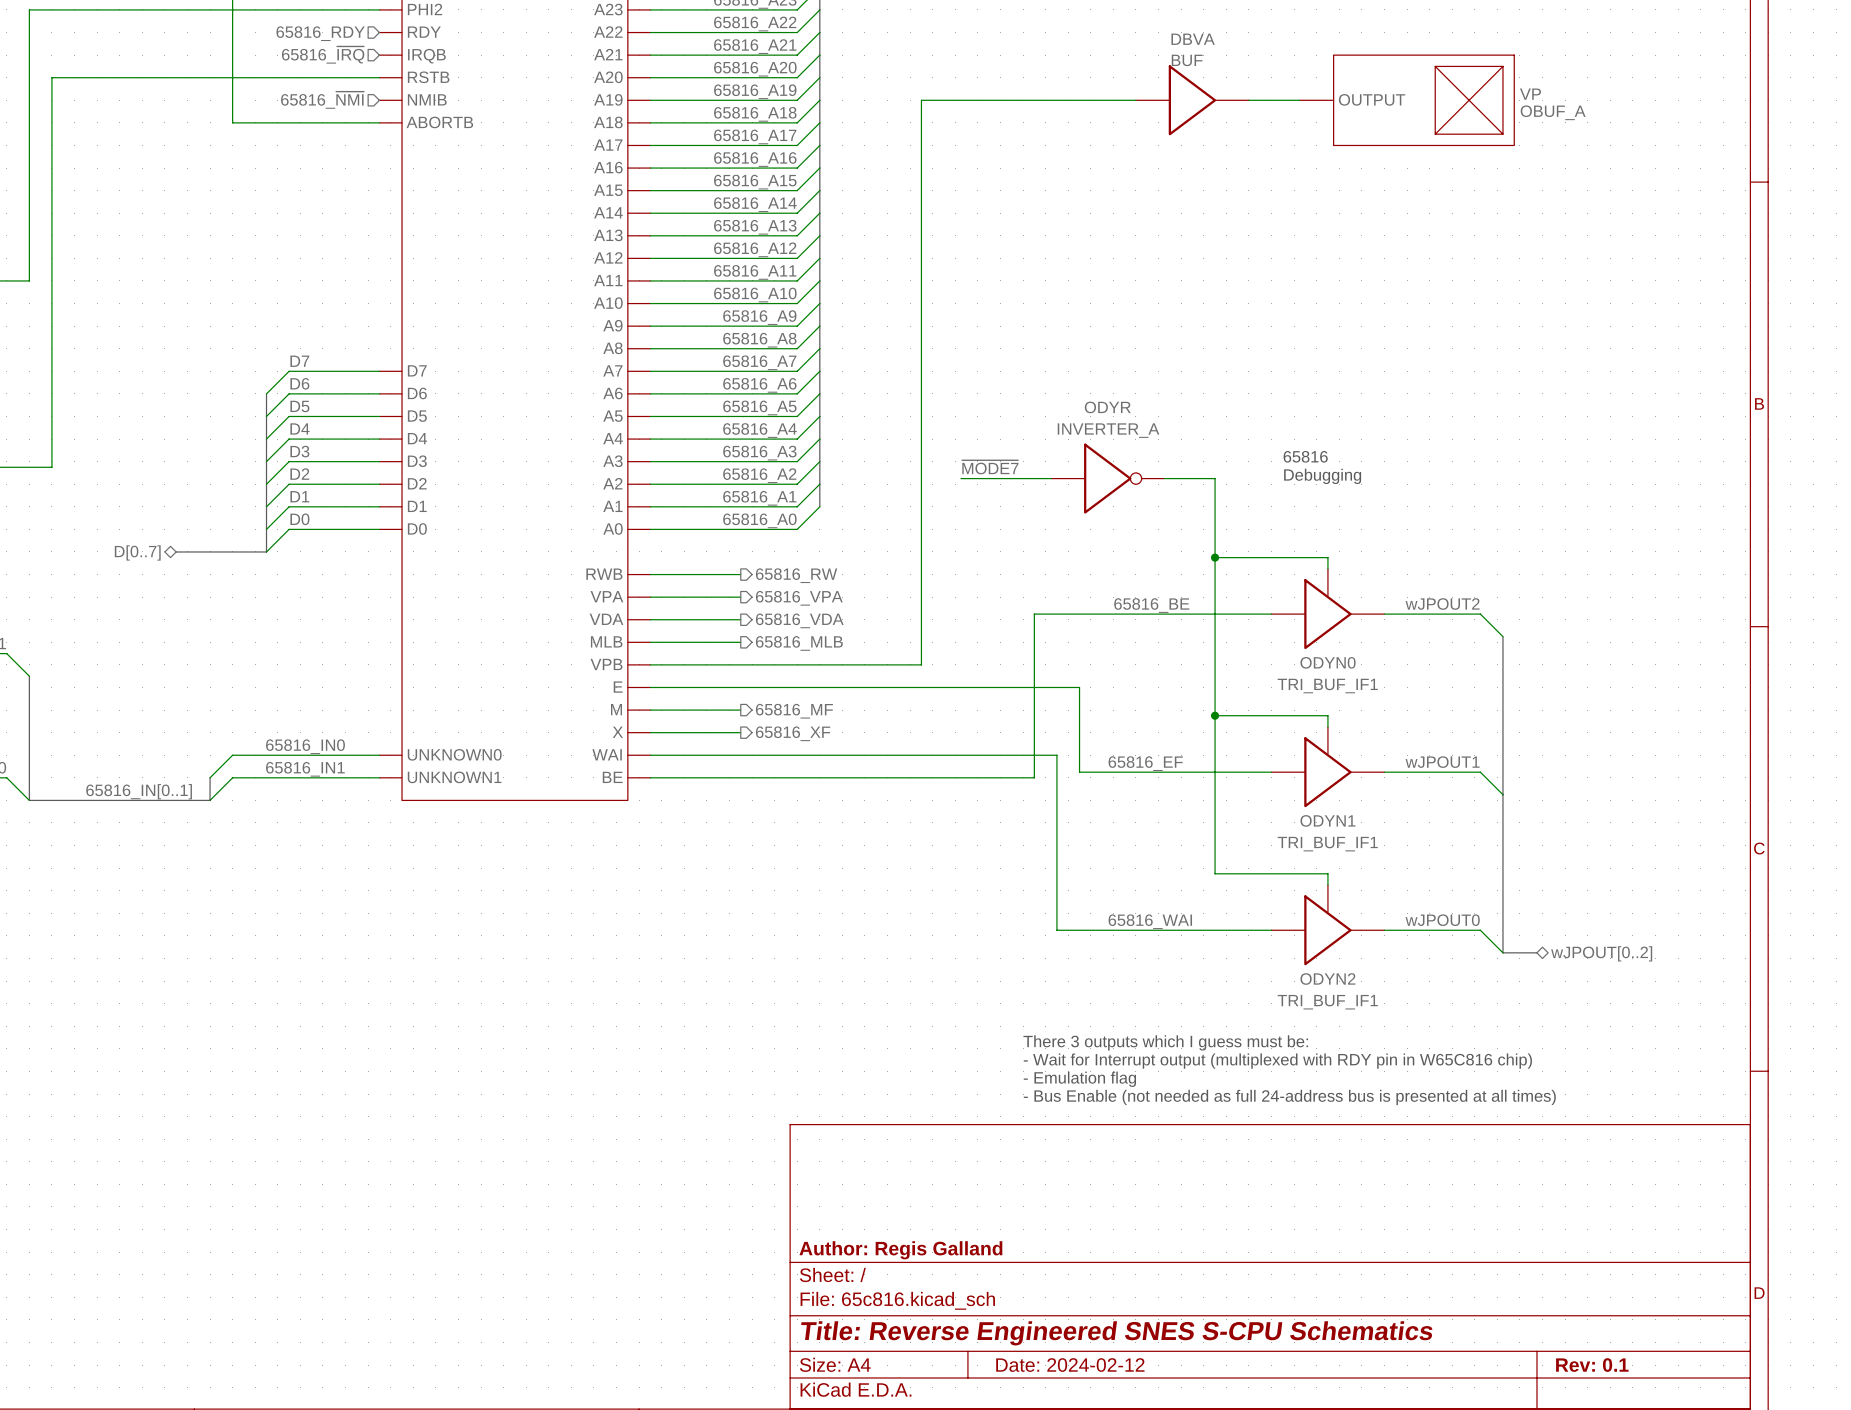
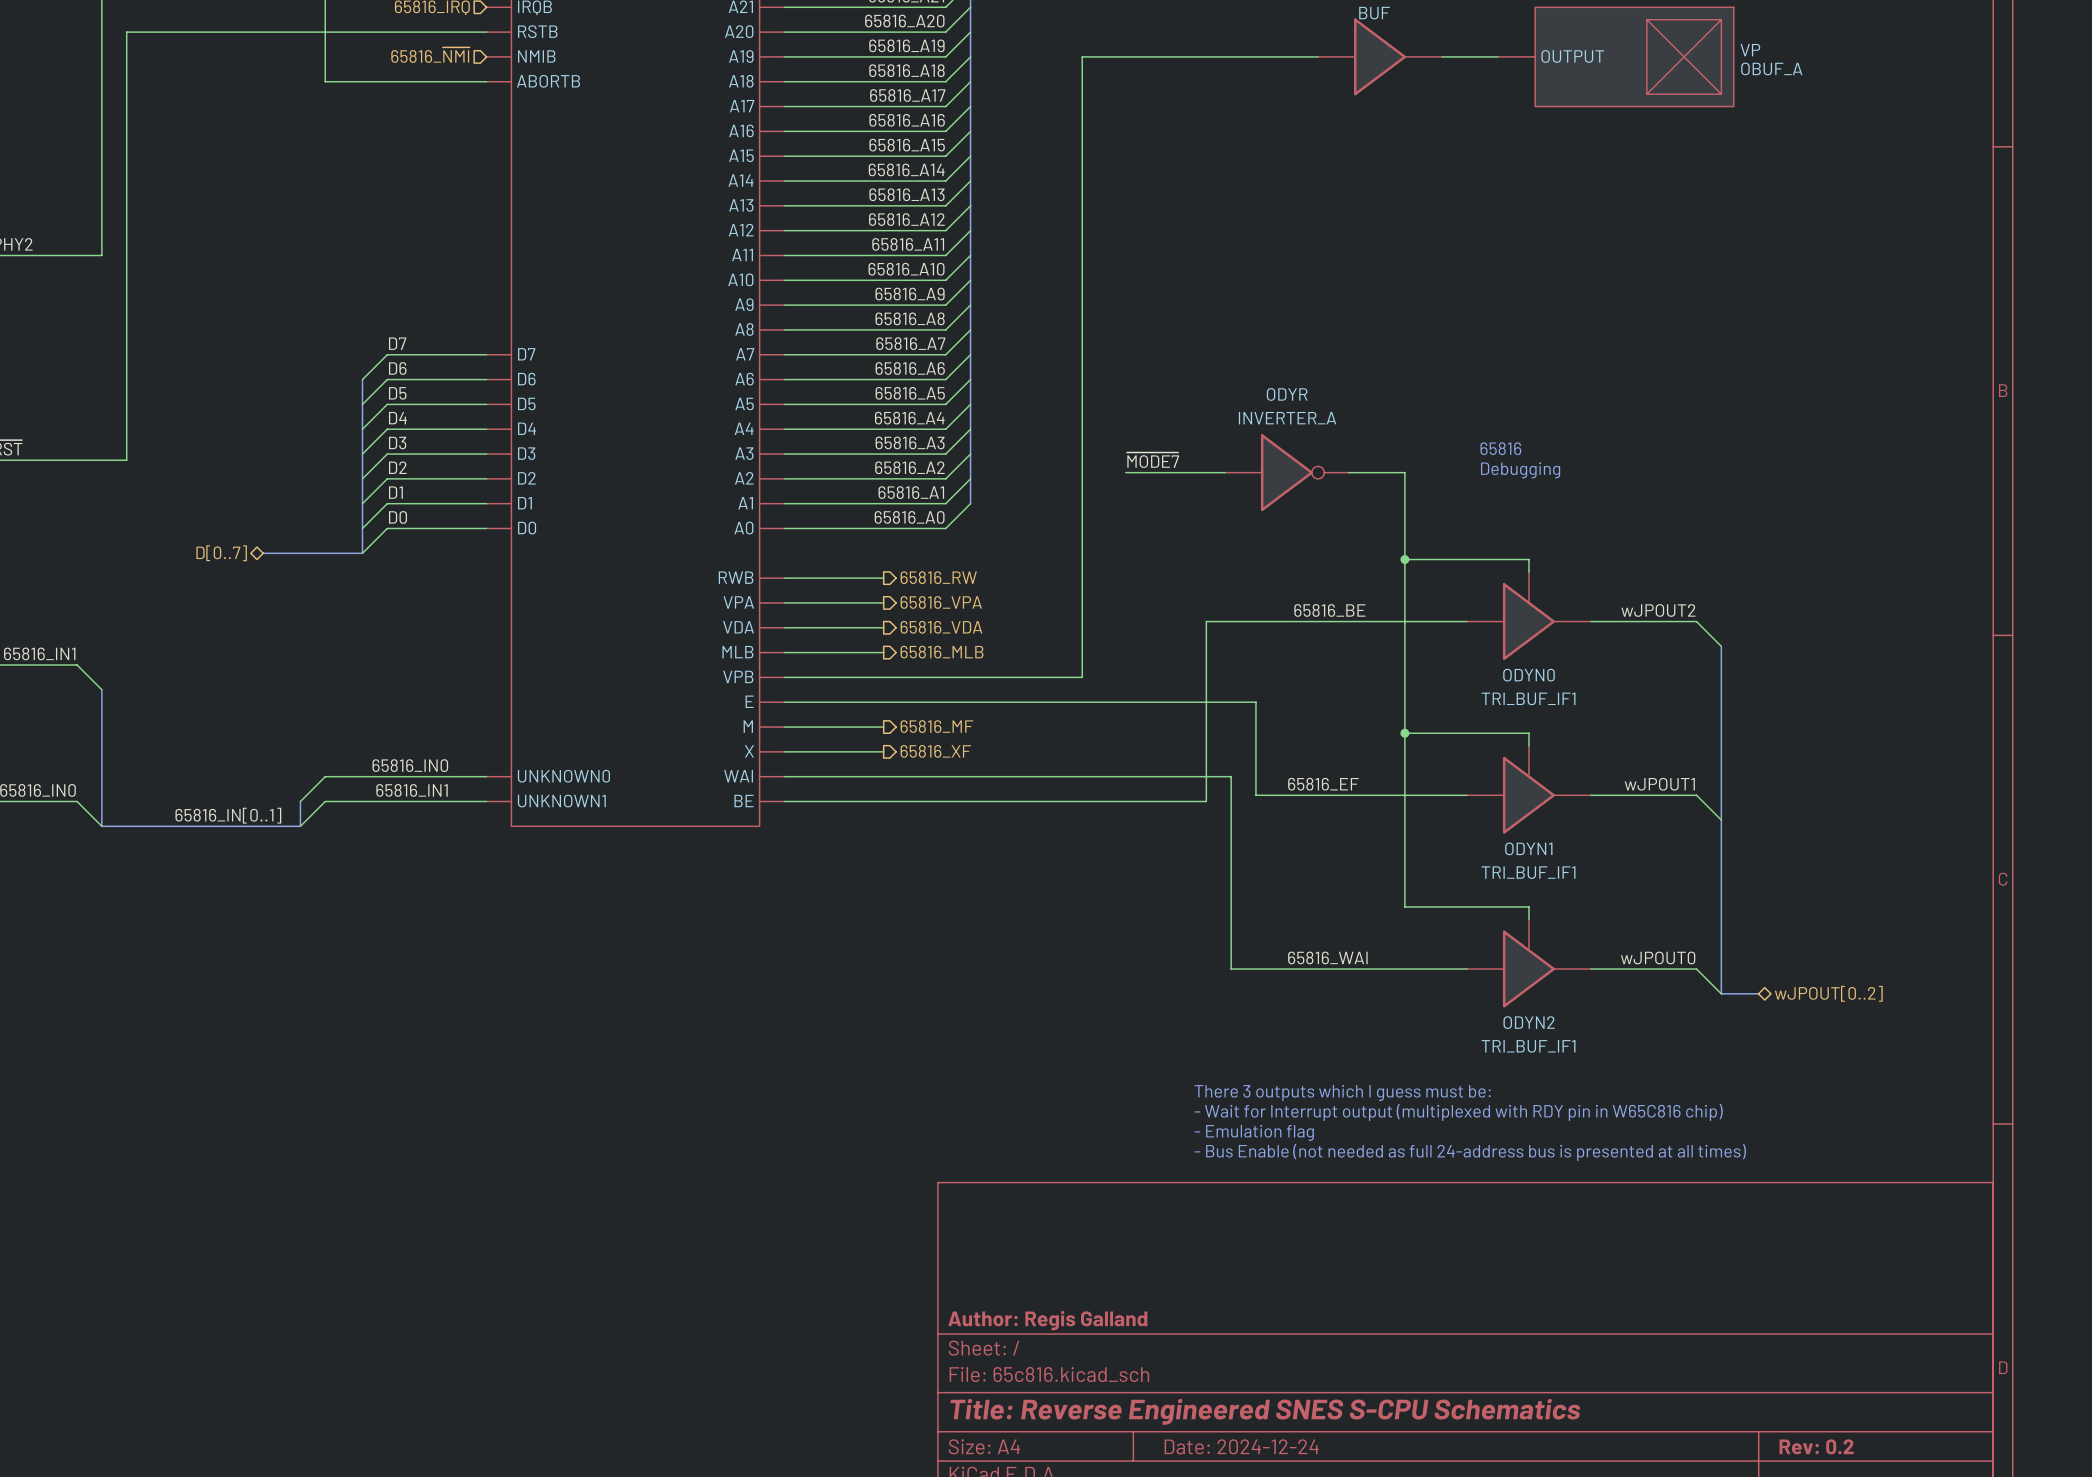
title block: Date: 2024-02-12 (1070, 1365) -> Date: 2024-12-24 (1241, 1446)
title block: Rev: 0.1 (1592, 1365) -> Rev: 0.2 (1816, 1446)

